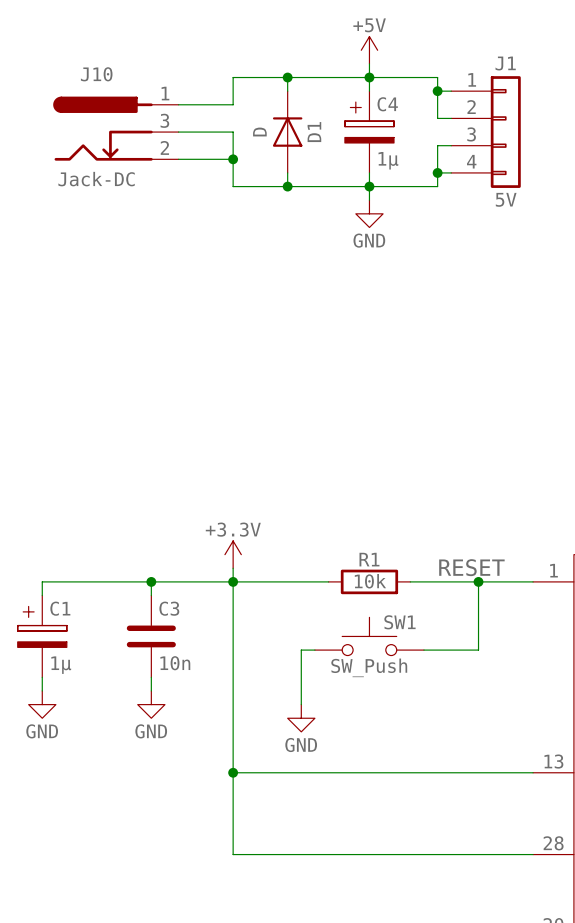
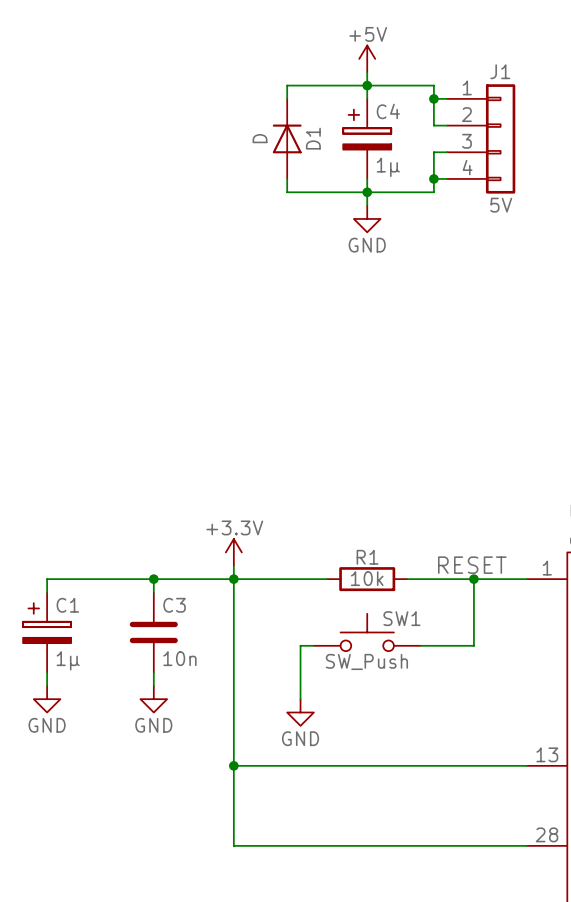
wire: (287, 77) (233, 77) (233, 104) (178, 104) -> none
junction: (287, 77) -> none
J10: Jack-DC (115, 128) -> none
wire: (178, 132) (233, 132) (233, 186) (287, 186) -> none
wire: (178, 159) (233, 159) -> none
junction: (233, 159) -> none
junction: (287, 186) -> none

